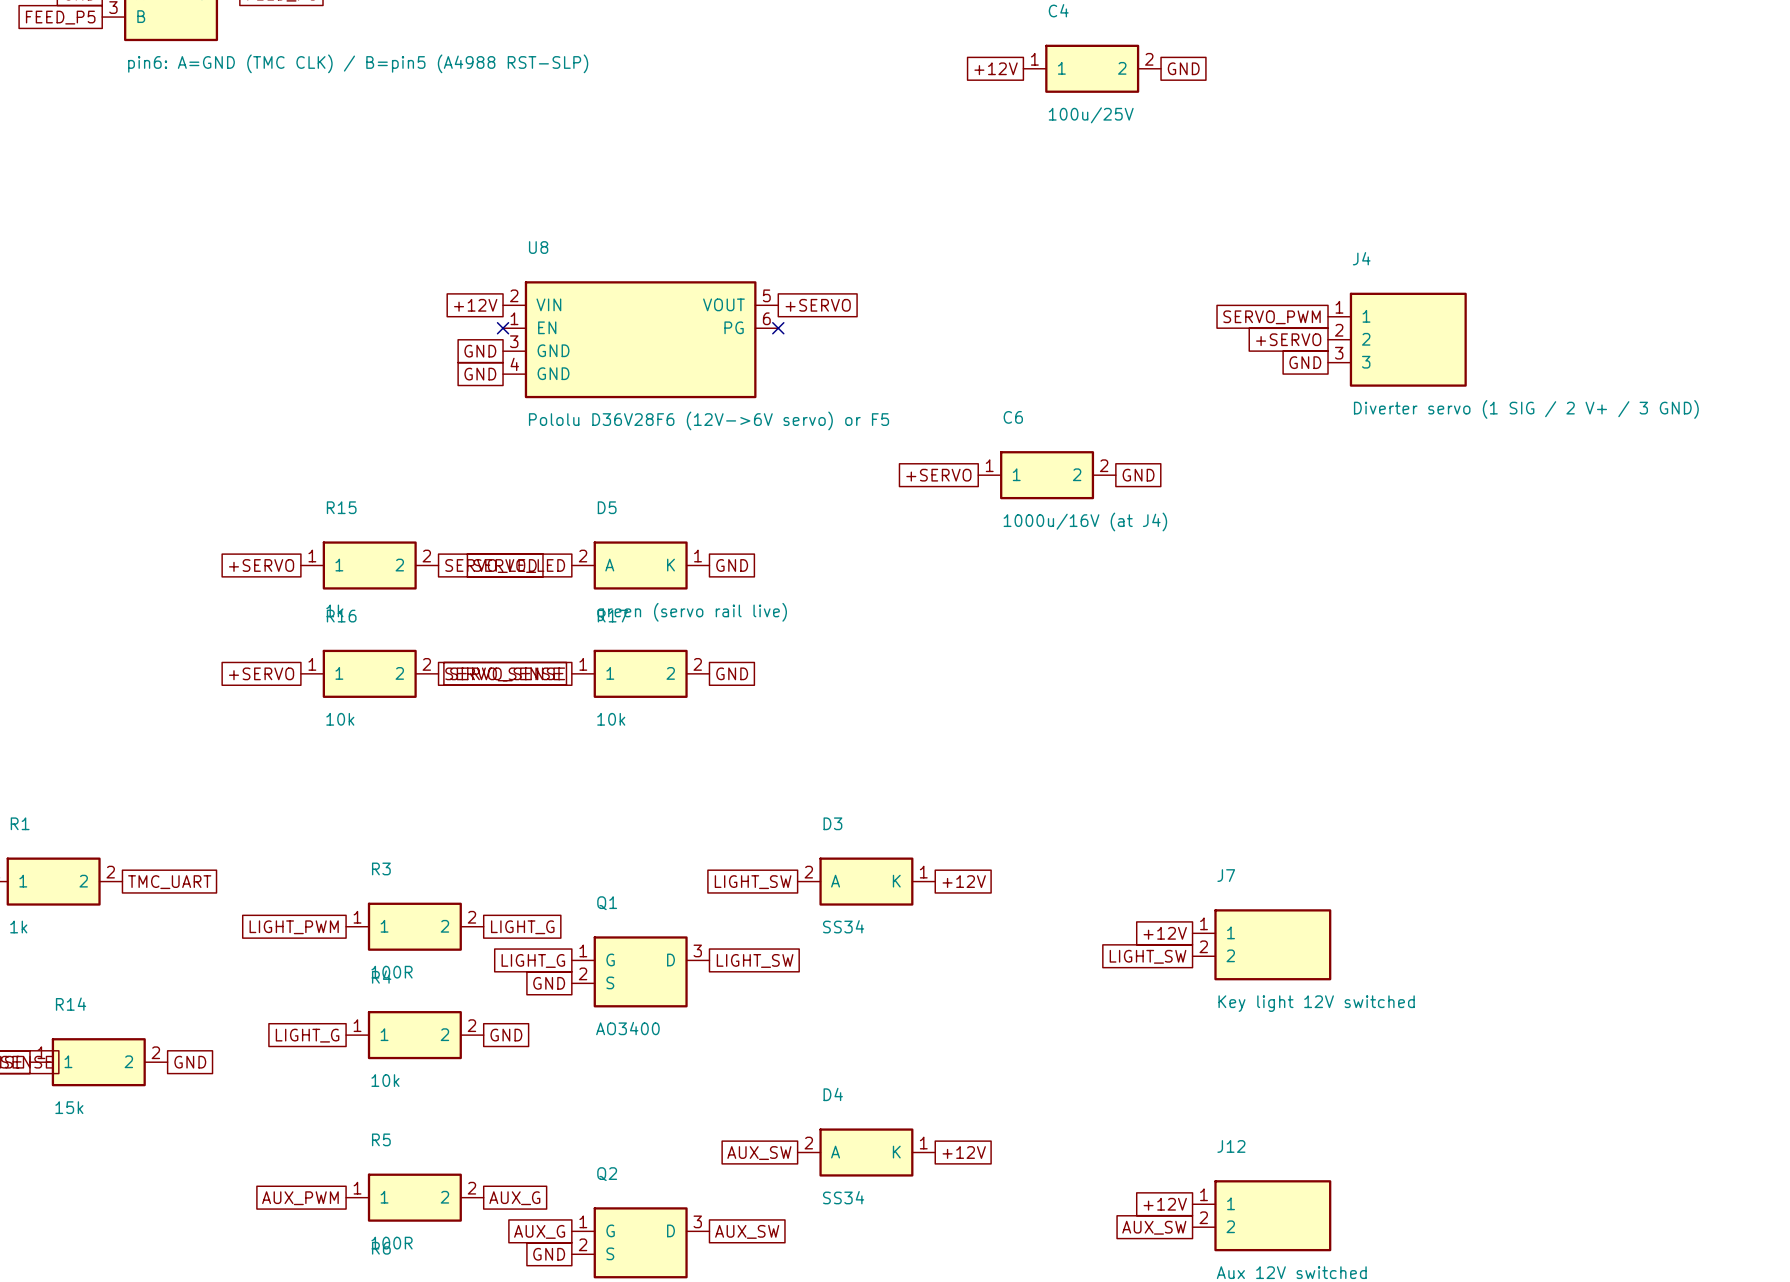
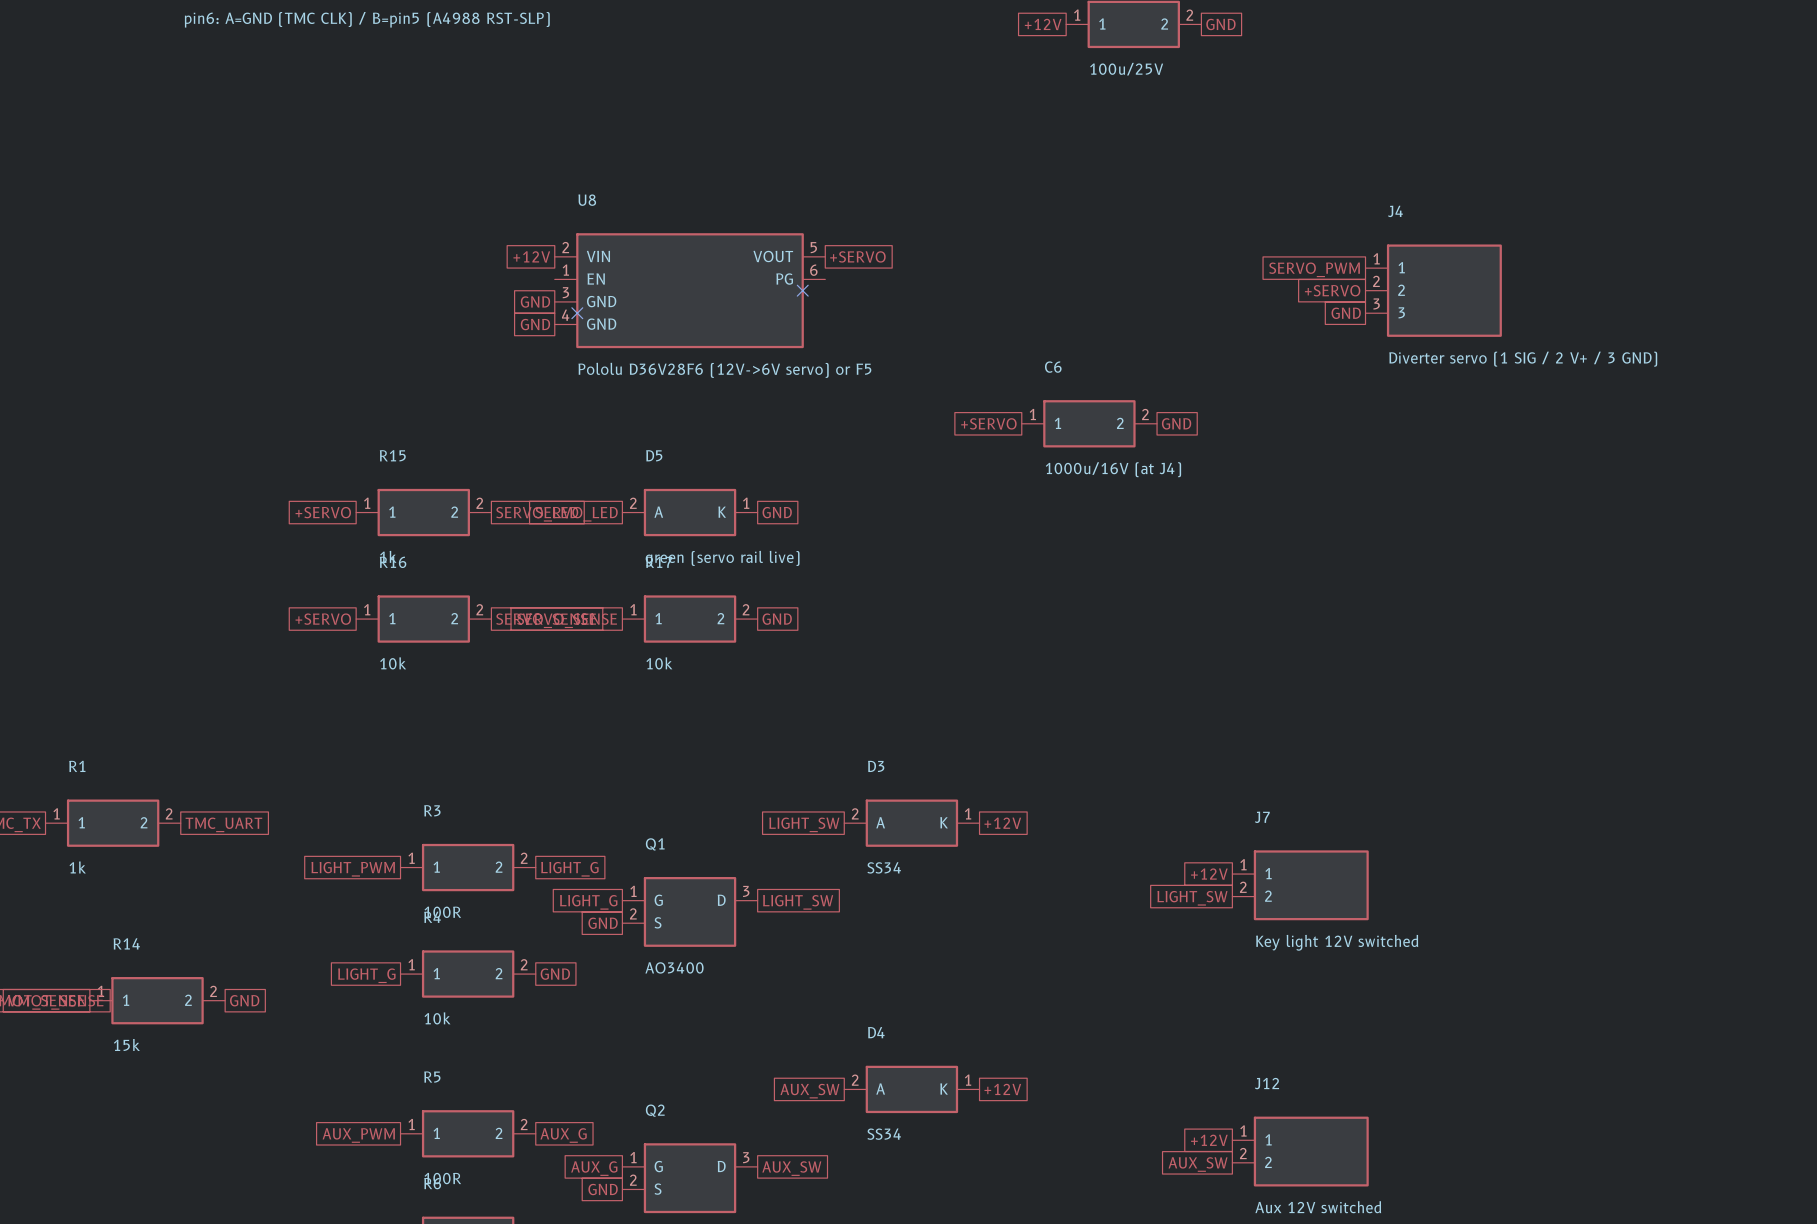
no-connect mark position: (503, 328) -> (577, 313)
no-connect mark position: (778, 328) -> (802, 290)

